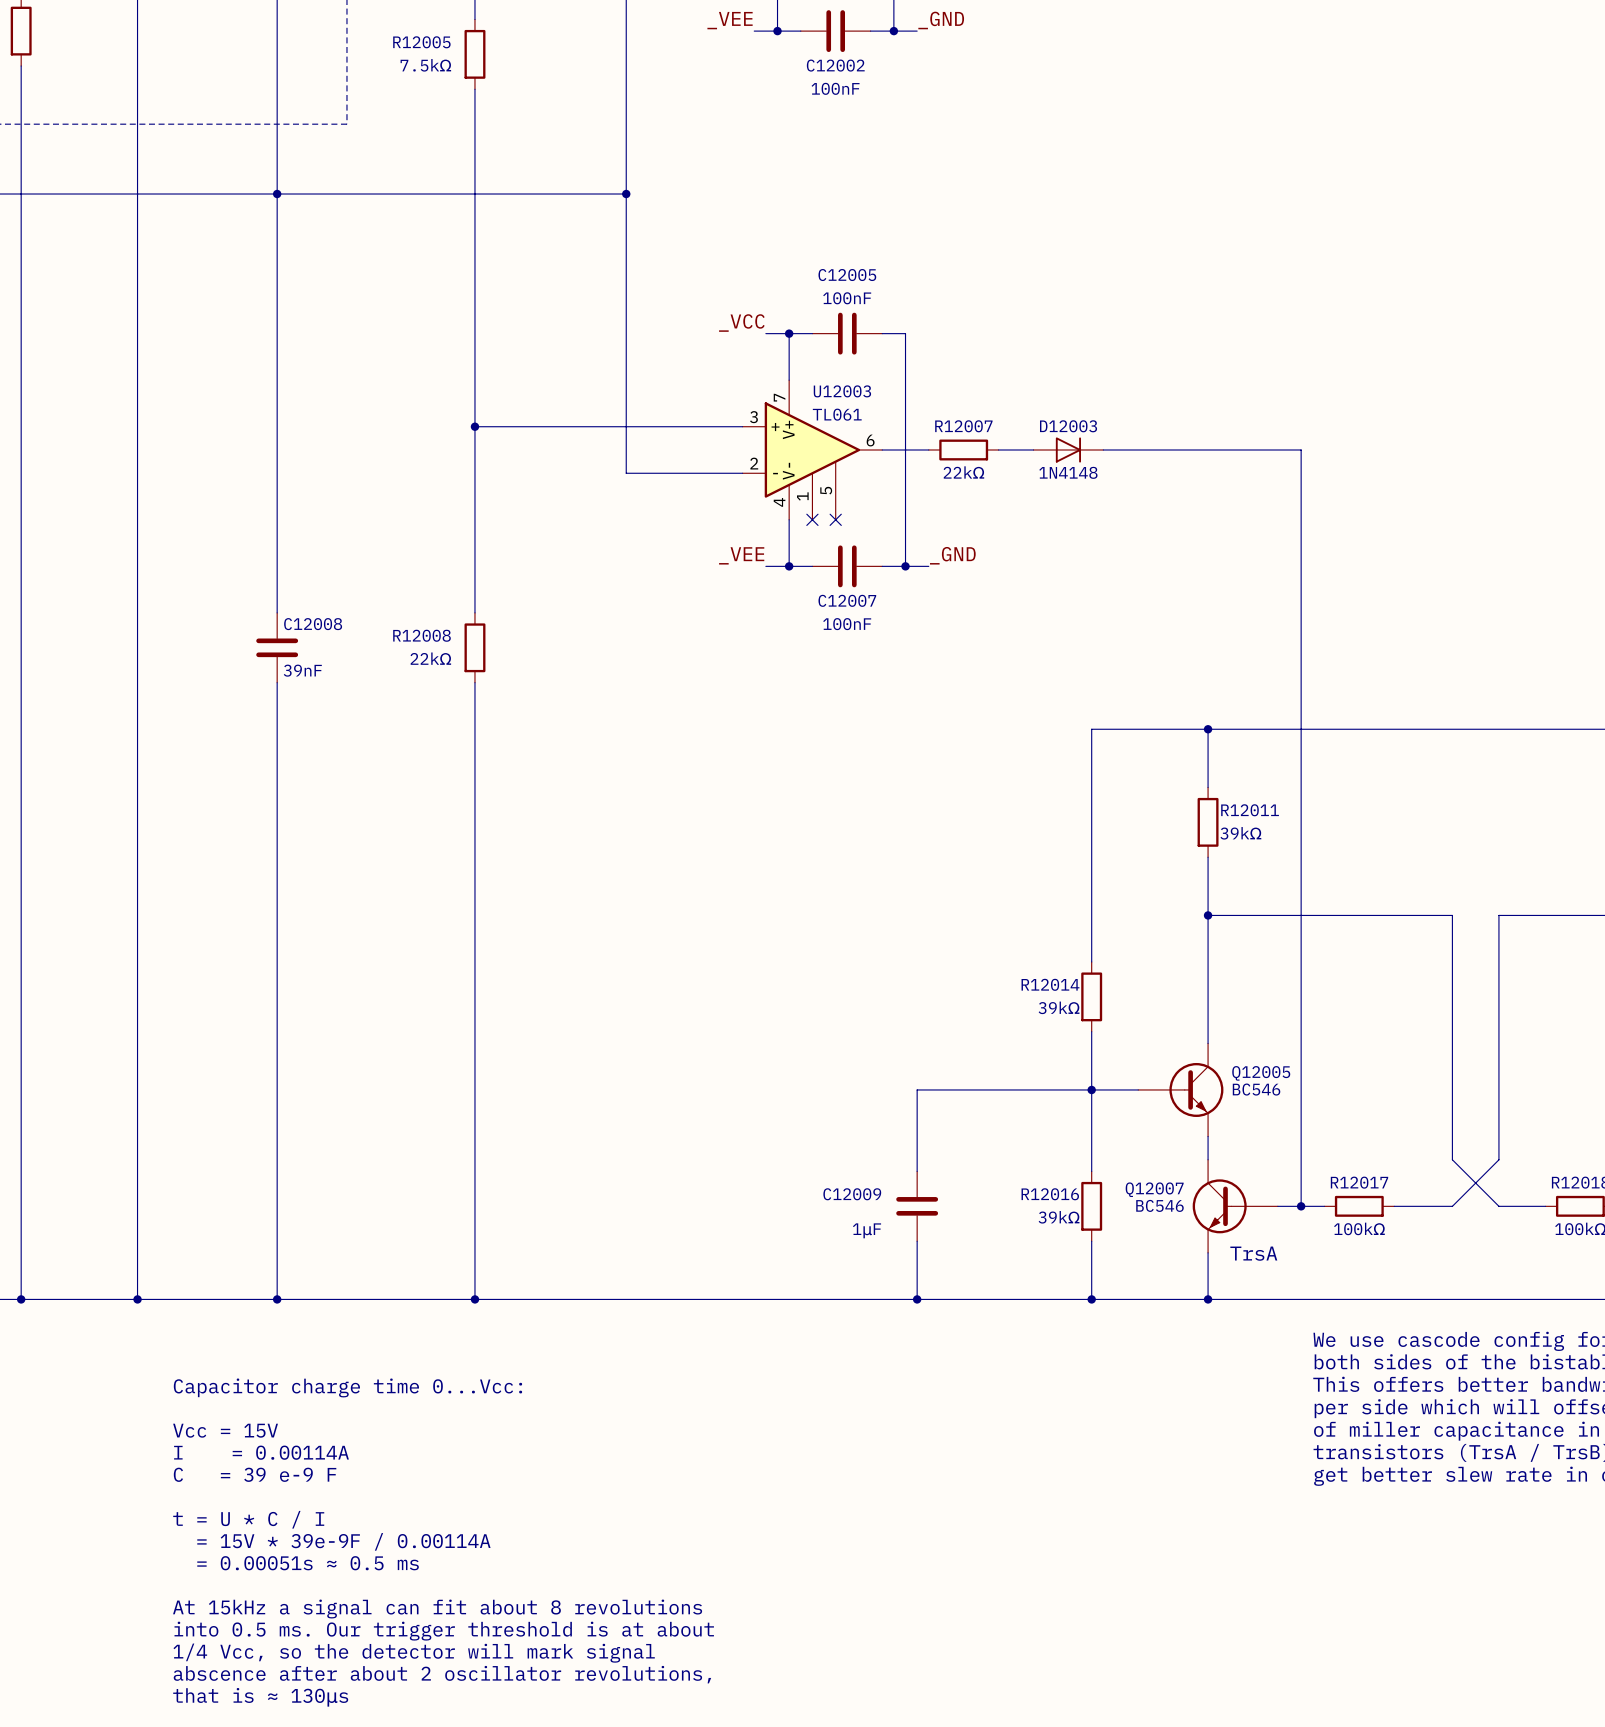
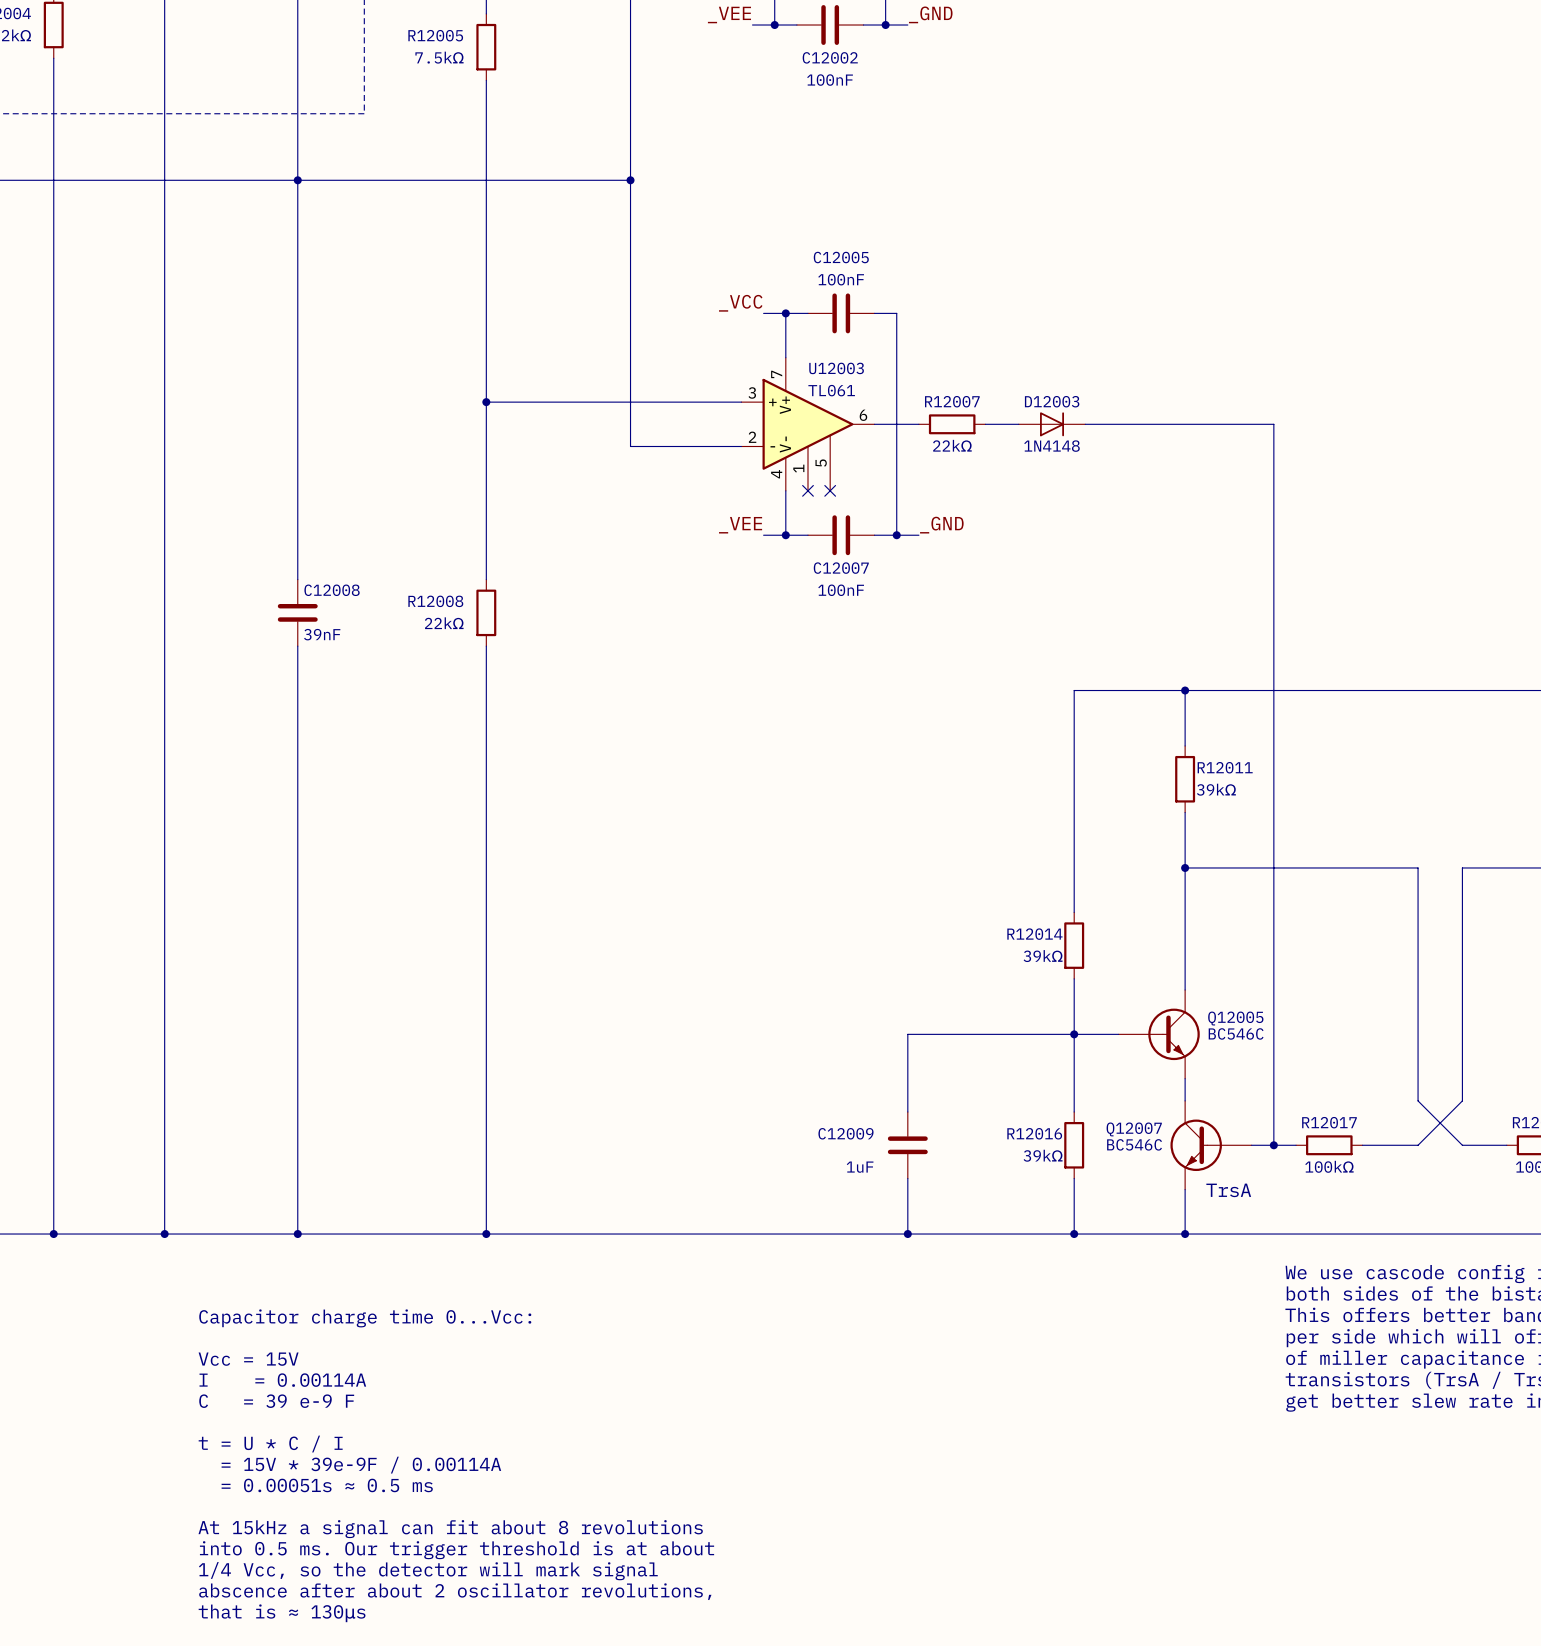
Q12005 value: BC546 (1256, 1089) -> BC546C (1236, 1033)
Q12007 value: BC546 (1159, 1205) -> BC546C (1134, 1144)
C12009 value: 1μF (867, 1230) -> 1uF (860, 1167)

